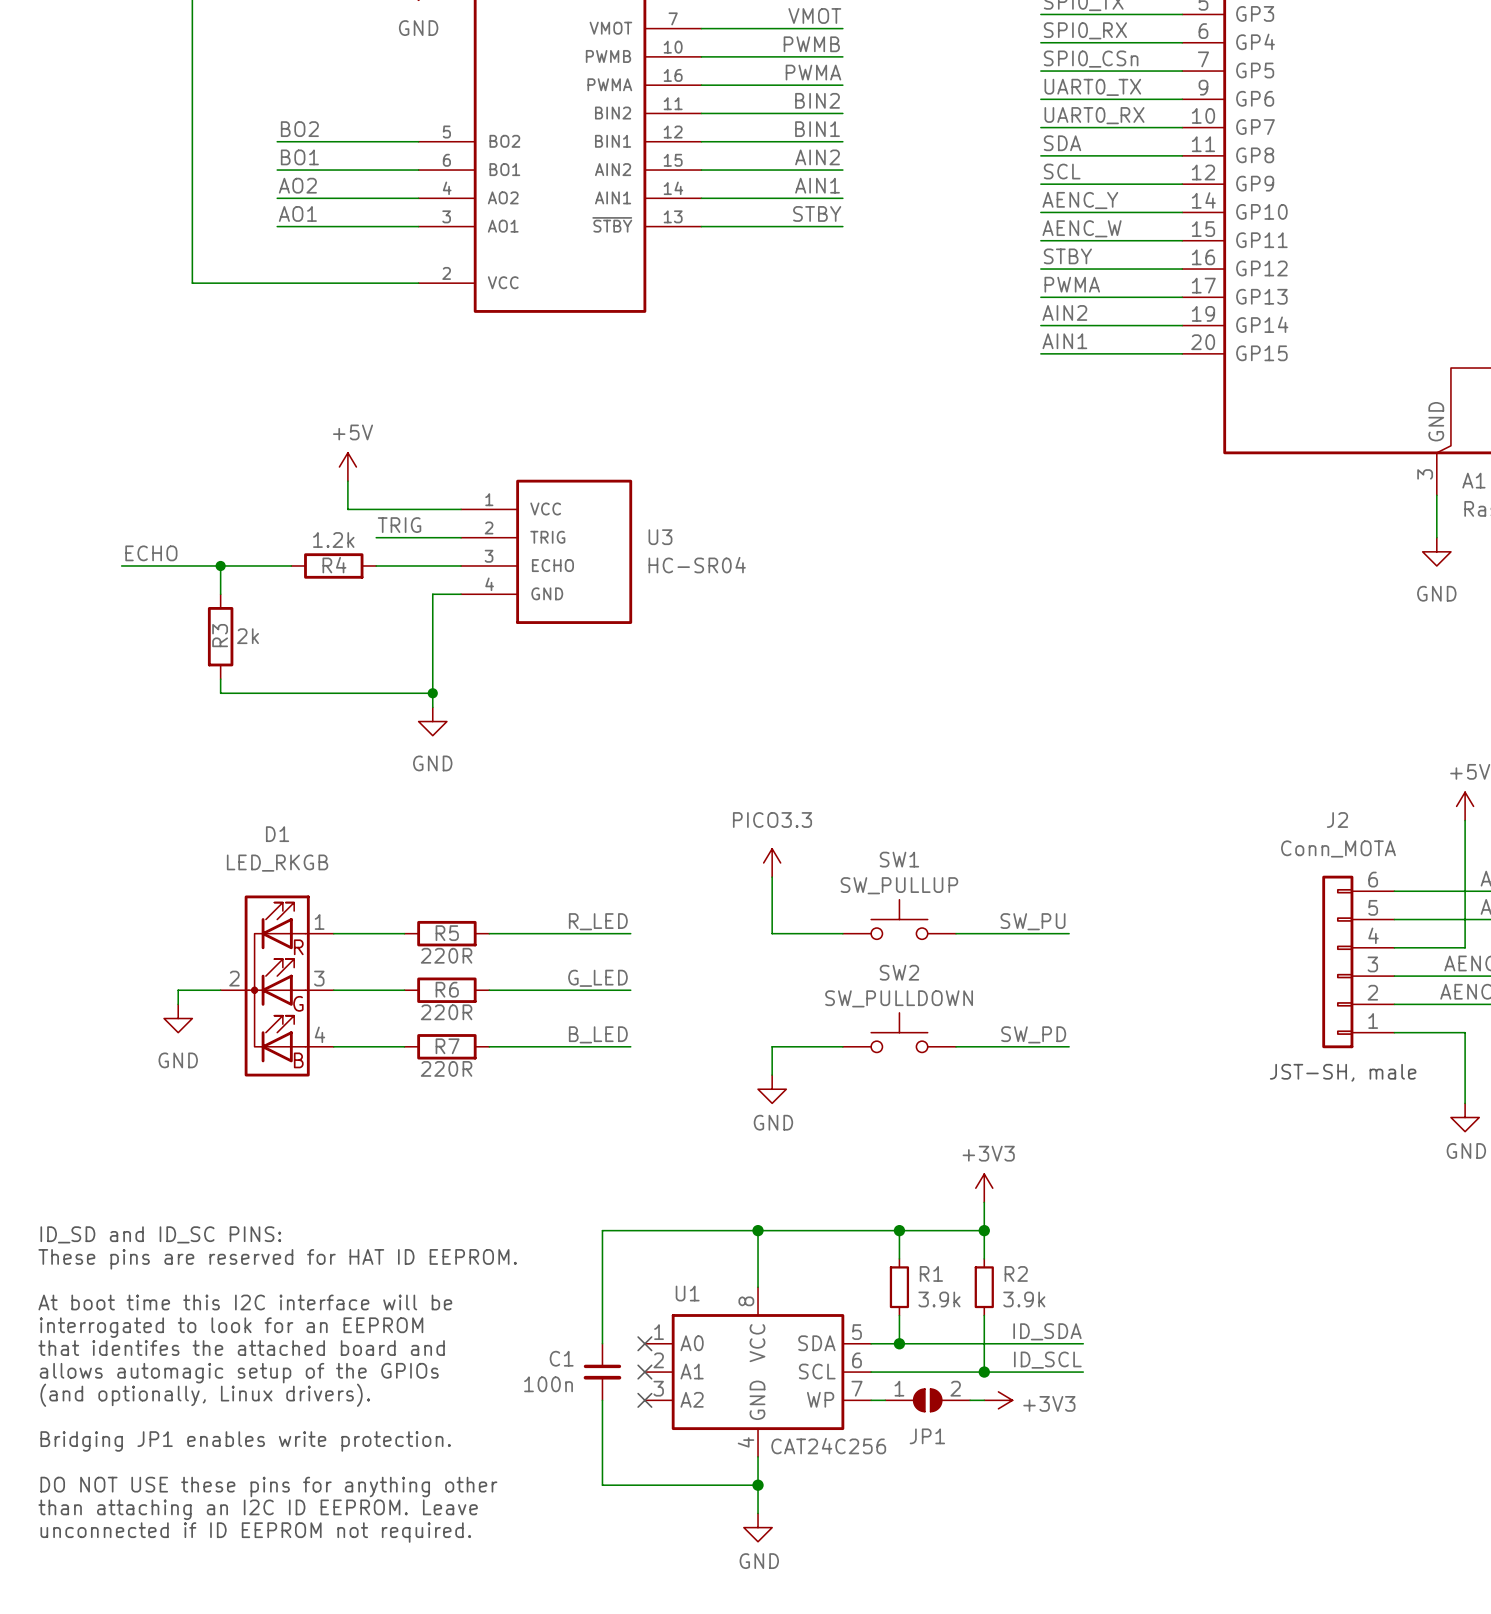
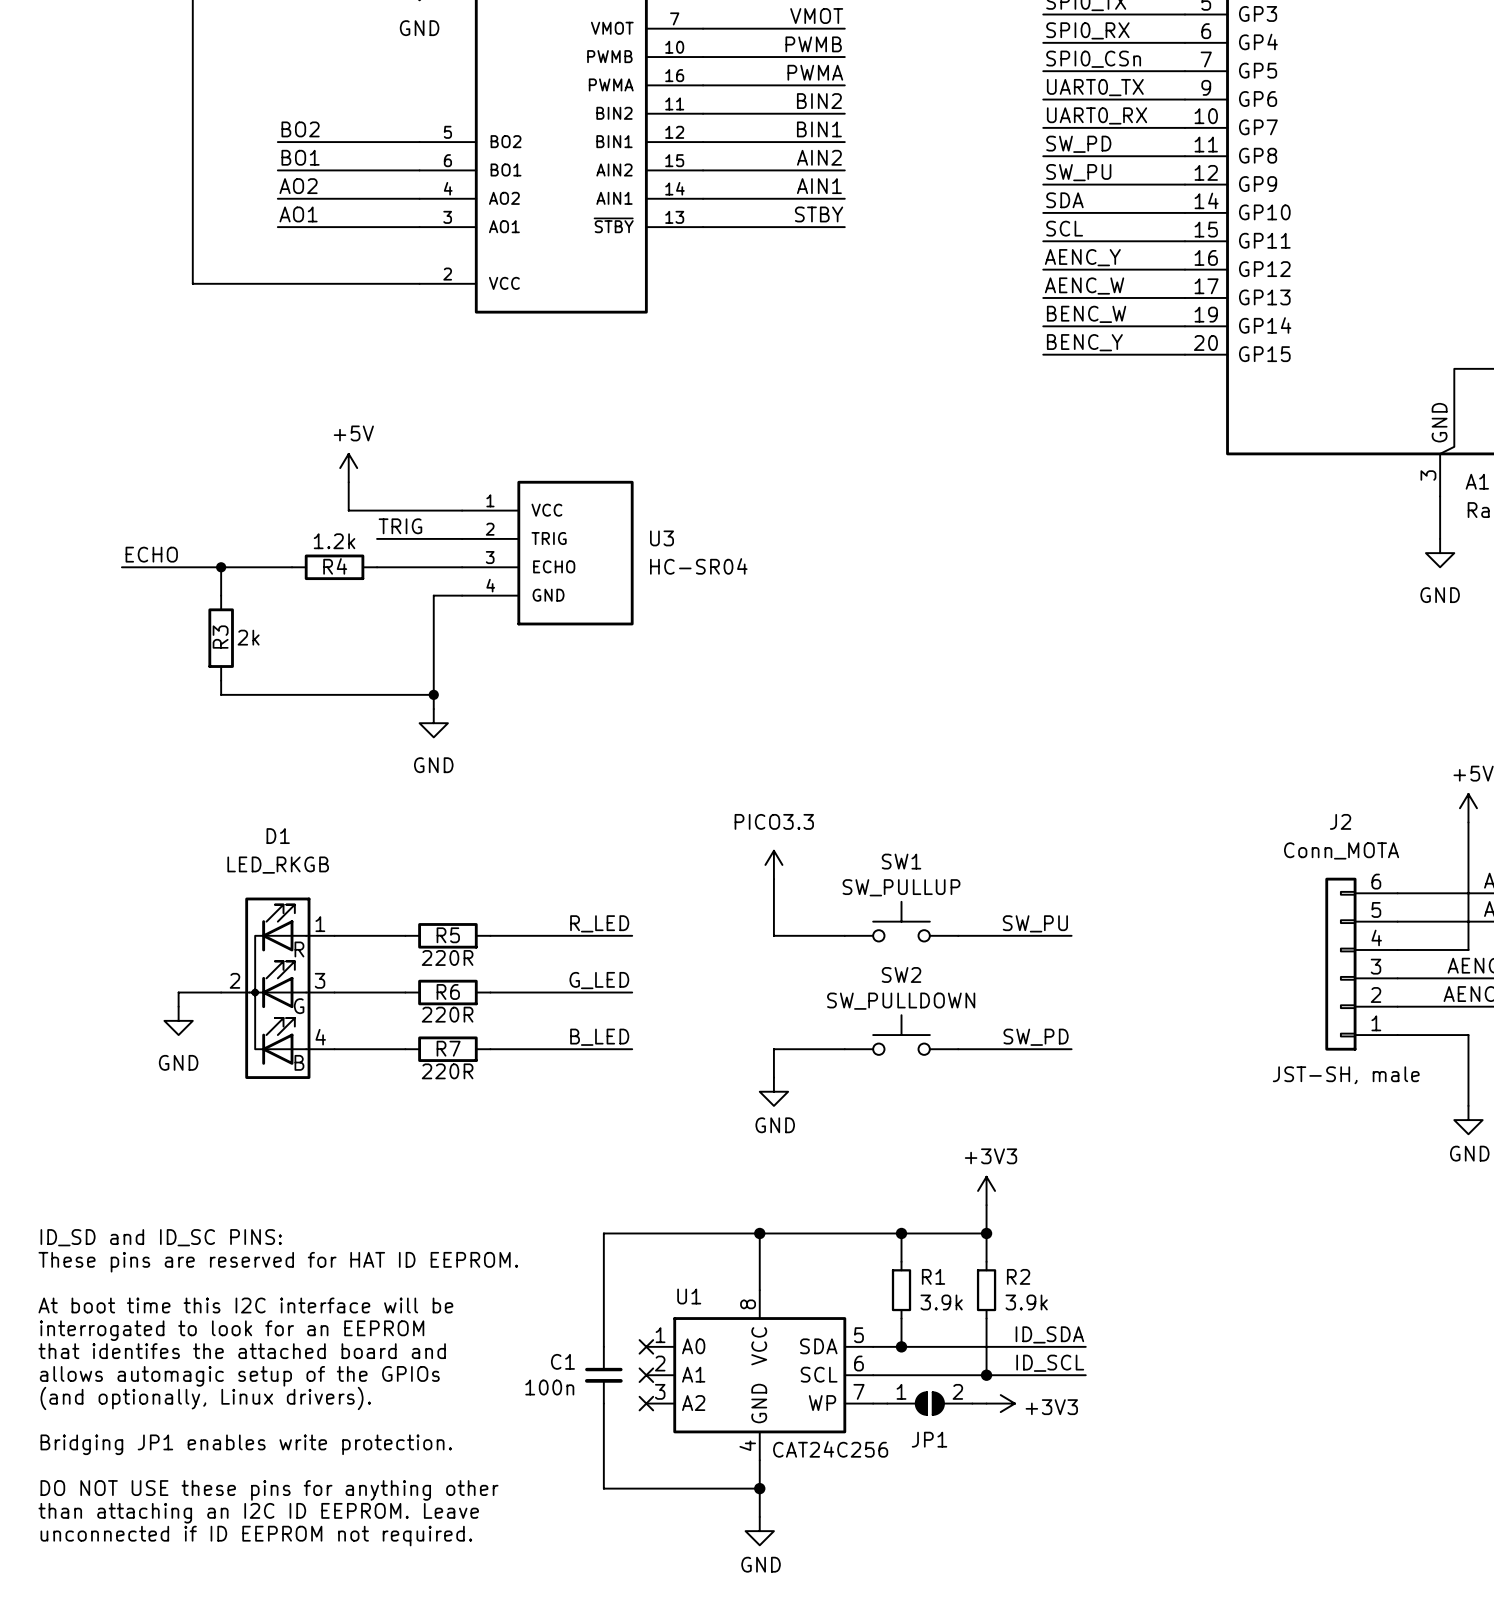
label: SDA (1062, 143) -> SW_PD (1078, 144)
label: SCL (1062, 171) -> SW_PU (1078, 172)
label: AENC_Y (1080, 200) -> SDA (1064, 200)
label: AENC_W (1082, 228) -> SCL (1064, 228)
label: STBY (1067, 256) -> AENC_Y (1082, 257)
label: PWMA (1072, 284) -> AENC_W (1084, 286)
label: AIN2 (1064, 312) -> BENC_W (1086, 314)
label: AIN1 (1064, 341) -> BENC_Y (1084, 342)

